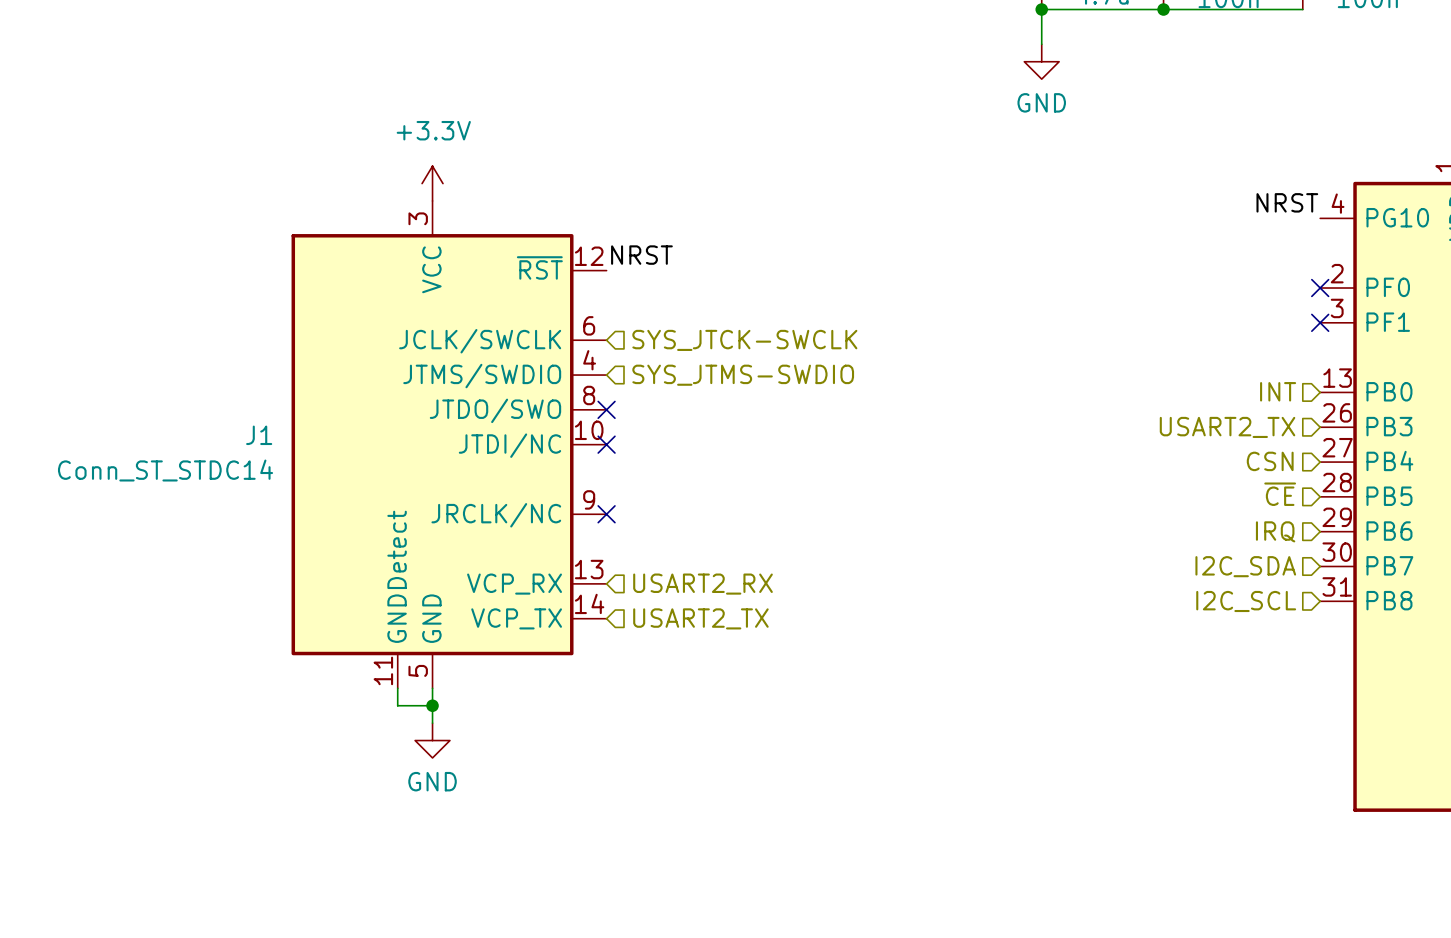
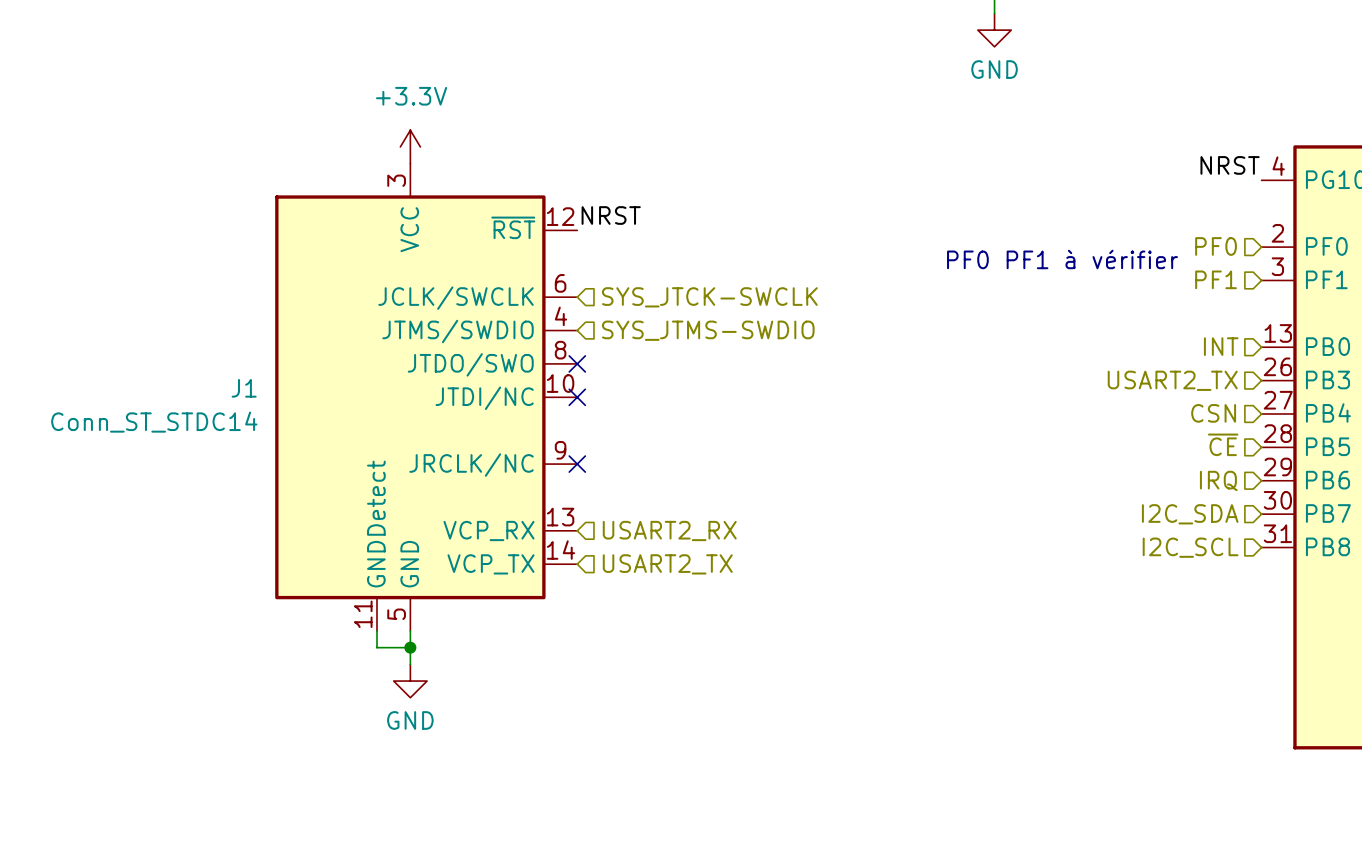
hierarchical label: none -> PF0 (1216, 246)
no-connect mark: (1320, 288) -> none
text: none -> PF0 PF1 à vérifier (1062, 259)
hierarchical label: none -> PF1 (1216, 279)
no-connect mark: (1320, 322) -> none

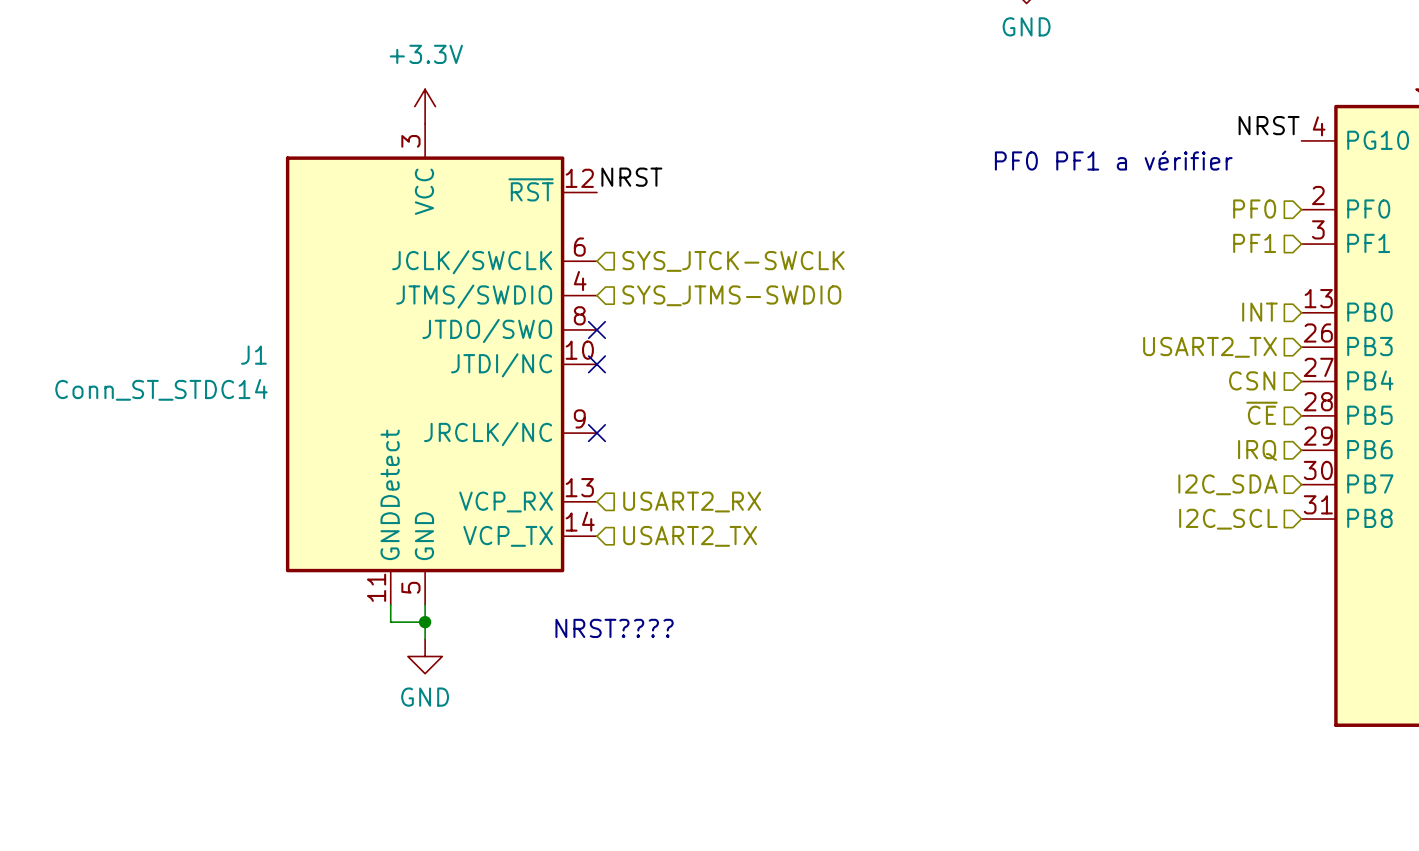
text: none -> PF0 PF1 a vérifier (1113, 160)
text: PF0 PF1 à vérifier (1062, 259) -> none
text: none -> NRST???? (614, 628)

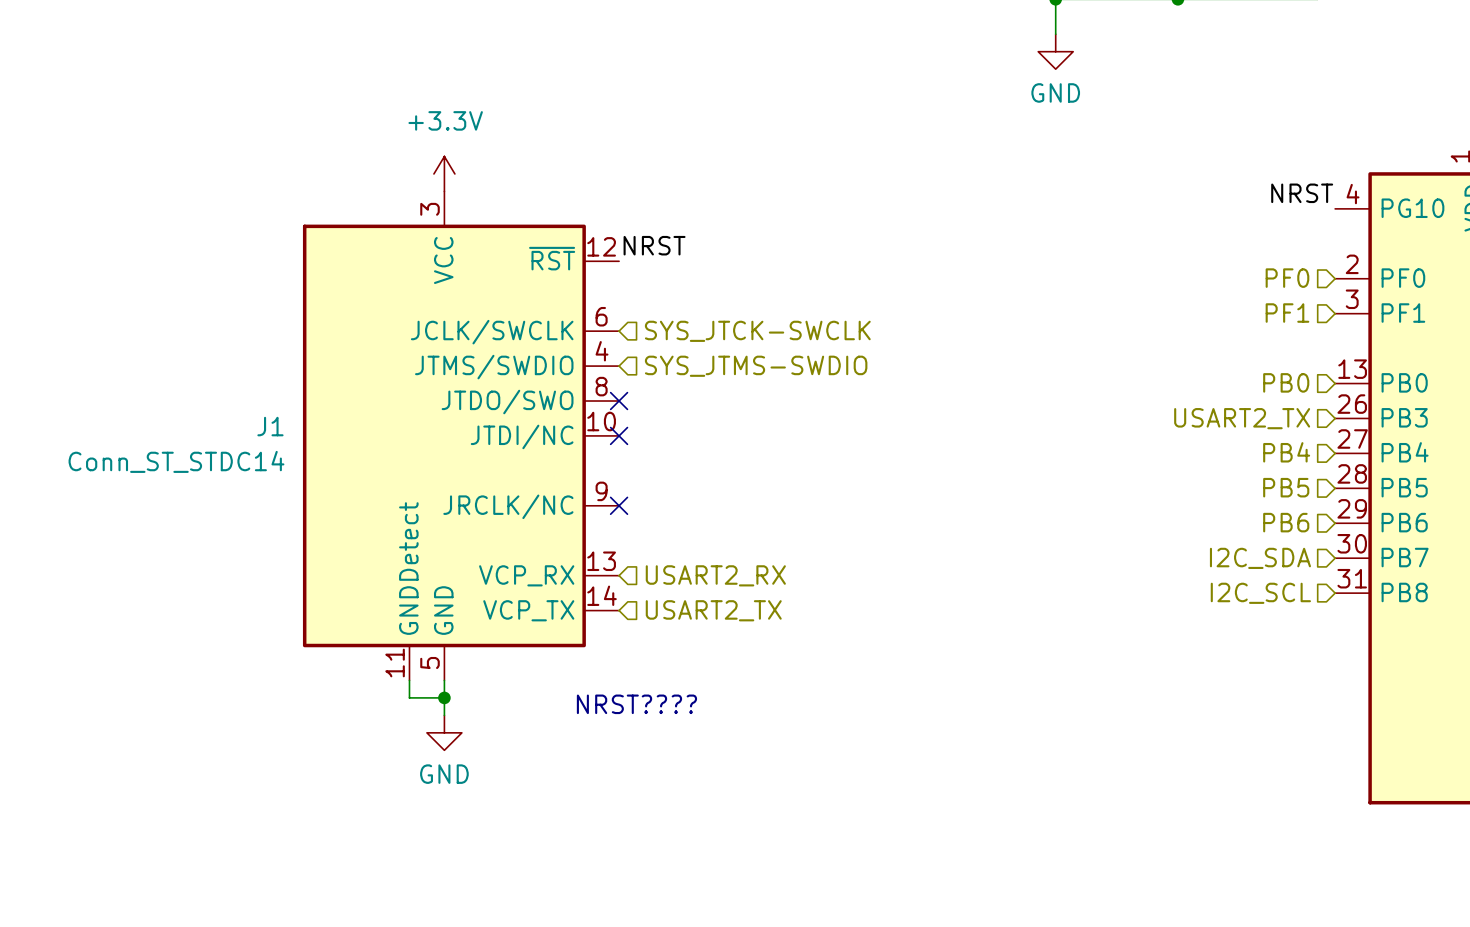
text: PF0 PF1 a vérifier (1113, 160) -> none
hierarchical label: INT (1259, 312) -> PB0 (1286, 382)
hierarchical label: CSN (1252, 380) -> PB4 (1286, 452)
hierarchical label: ~{CE} (1262, 413) -> PB5 (1286, 487)
hierarchical label: IRQ (1257, 450) -> PB6 (1286, 522)

